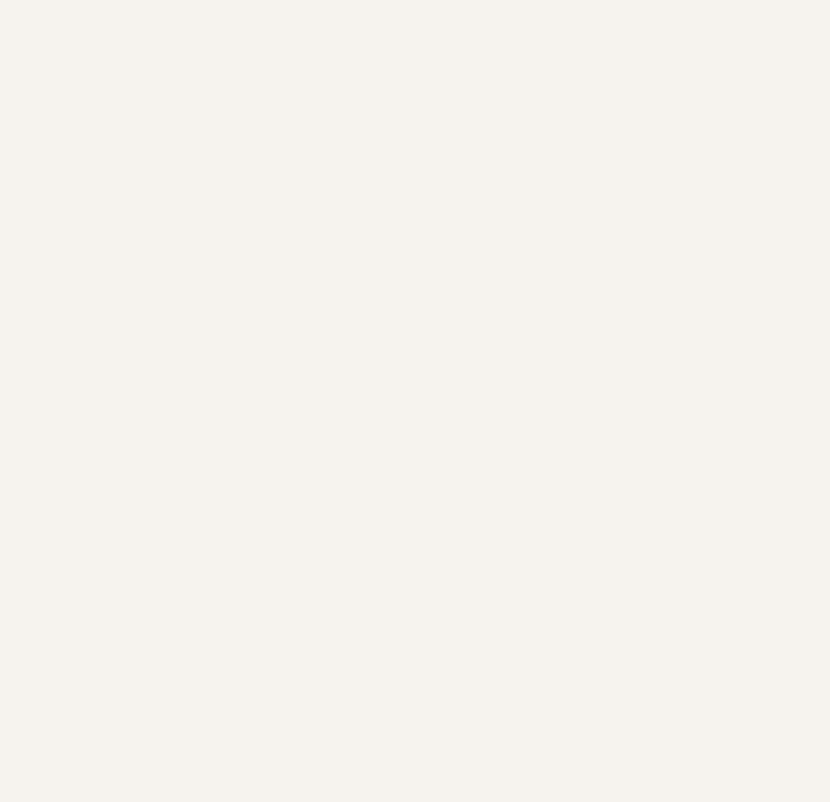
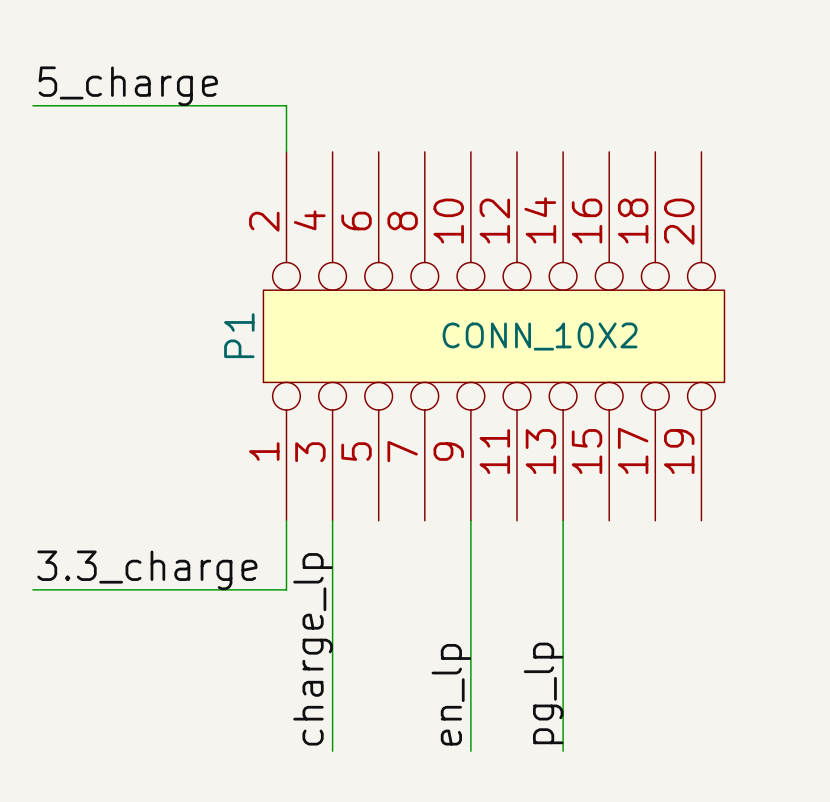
label: none -> 5_charge (128, 86)
wire: none -> (32, 105) (286, 105) (286, 151)
P1: none -> CONN_10X2 (493, 336)
wire: none -> (286, 520) (286, 589) (32, 589)
wire: none -> (332, 520) (332, 751)
wire: none -> (470, 520) (470, 751)
wire: none -> (563, 520) (563, 751)
label: none -> 3.3_charge (147, 570)
label: none -> charge_lp (313, 649)
label: none -> pg_lp (543, 693)
label: none -> en_lp (451, 694)

